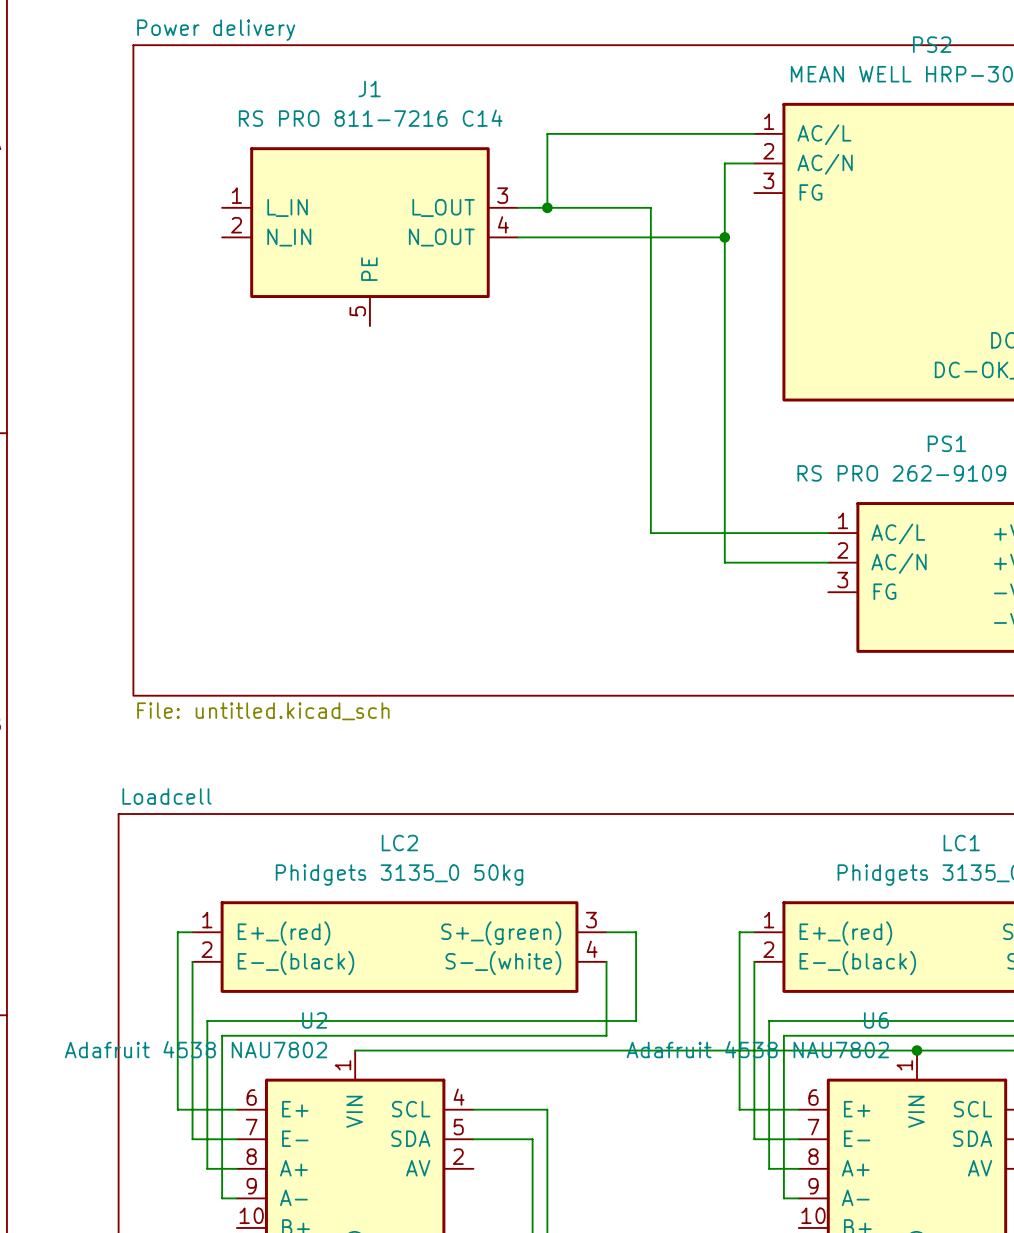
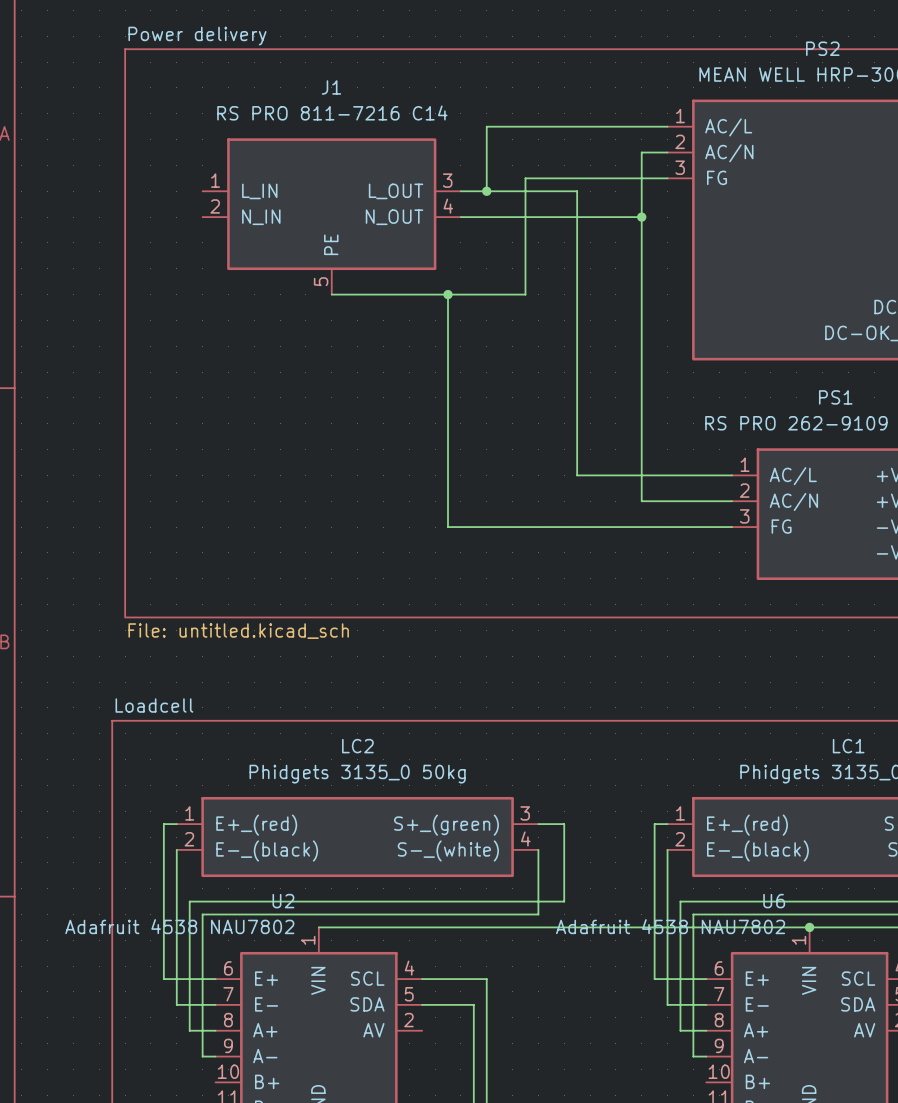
wire: none -> (667, 178) (525, 178) (525, 294) (331, 294)
wire: none -> (447, 294) (447, 527) (732, 527)
junction: none -> (447, 294)

